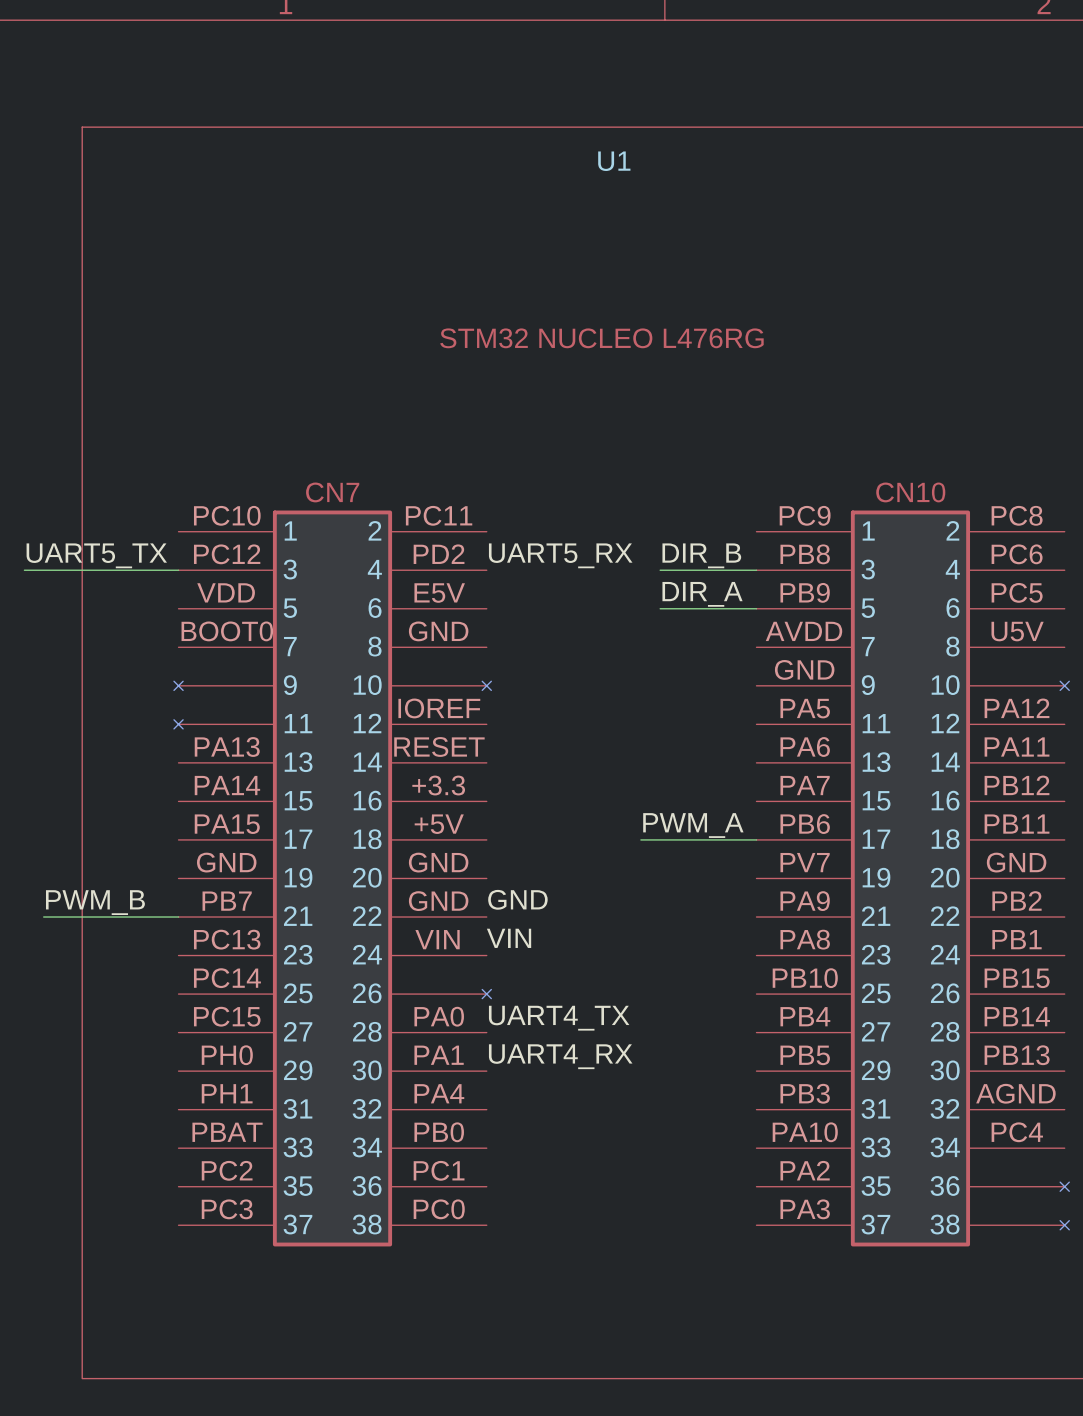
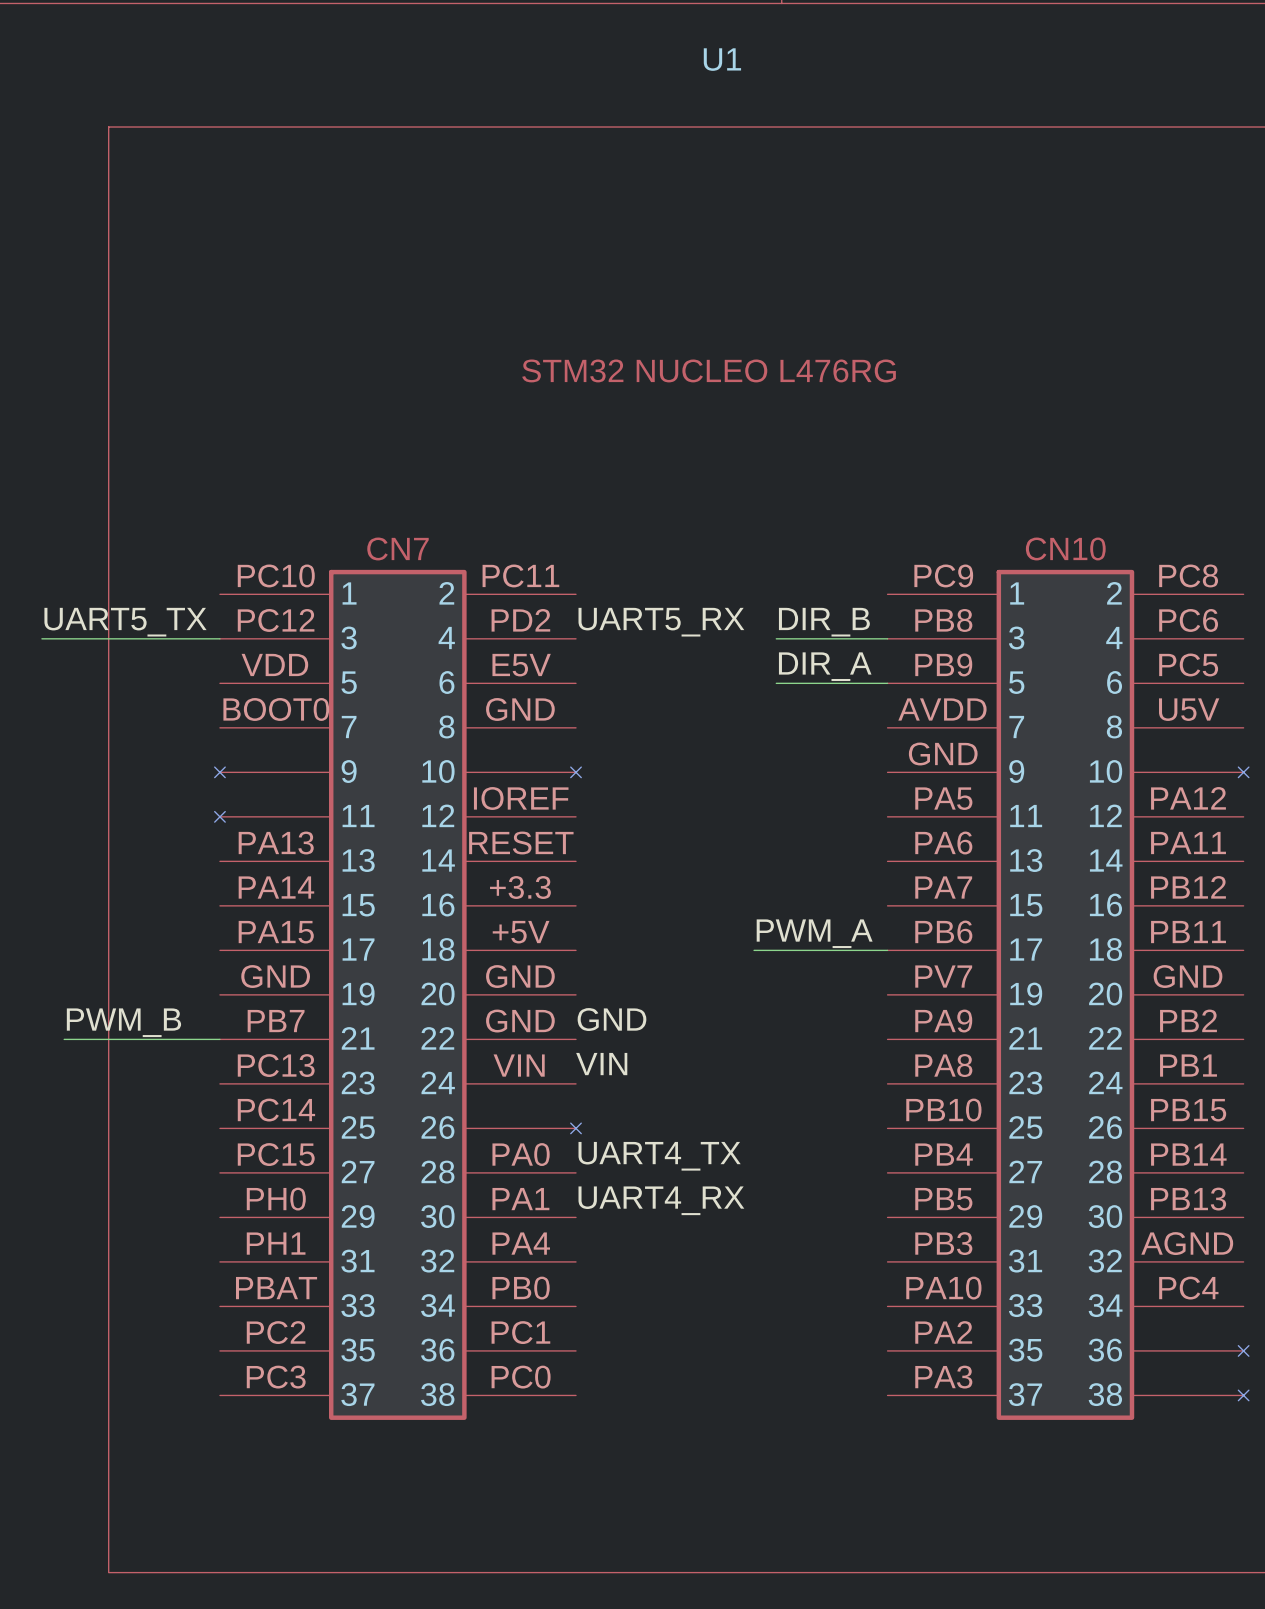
U1 name position: U1 (614, 161) -> U1 (722, 59)

